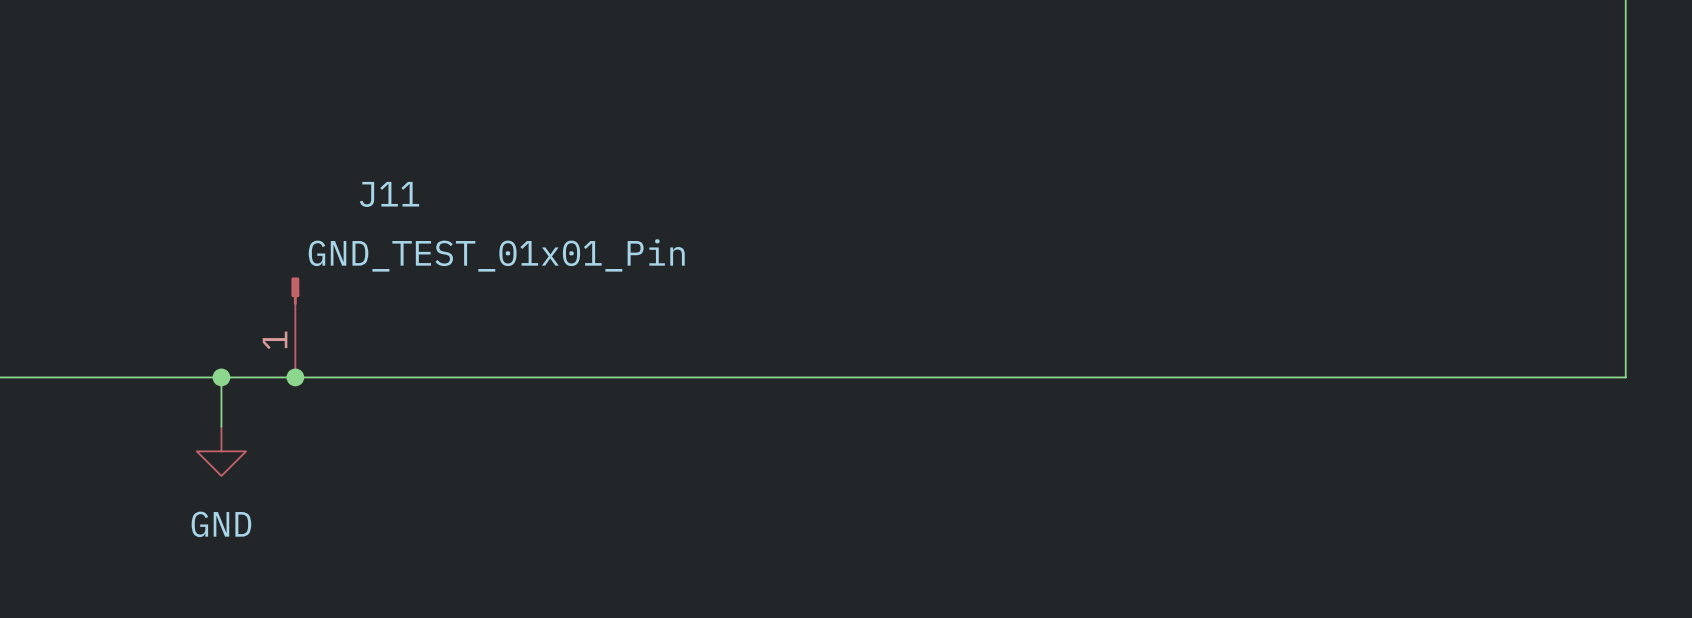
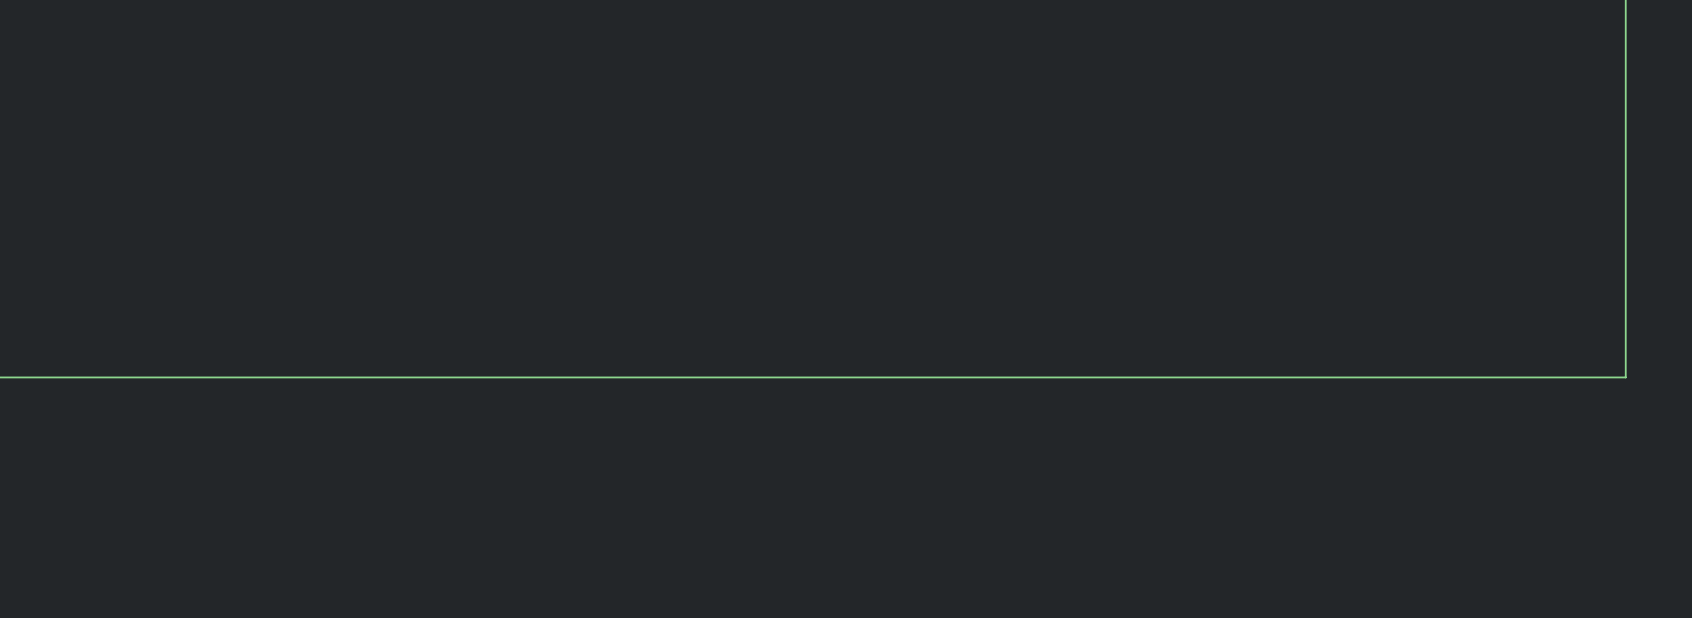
J11: GND_TEST_01x01_Pin (295, 327) -> none
wire: (221, 377) (221, 426) -> none
junction: (221, 377) -> none
junction: (295, 377) -> none
power symbol: GND (221, 451) -> none

